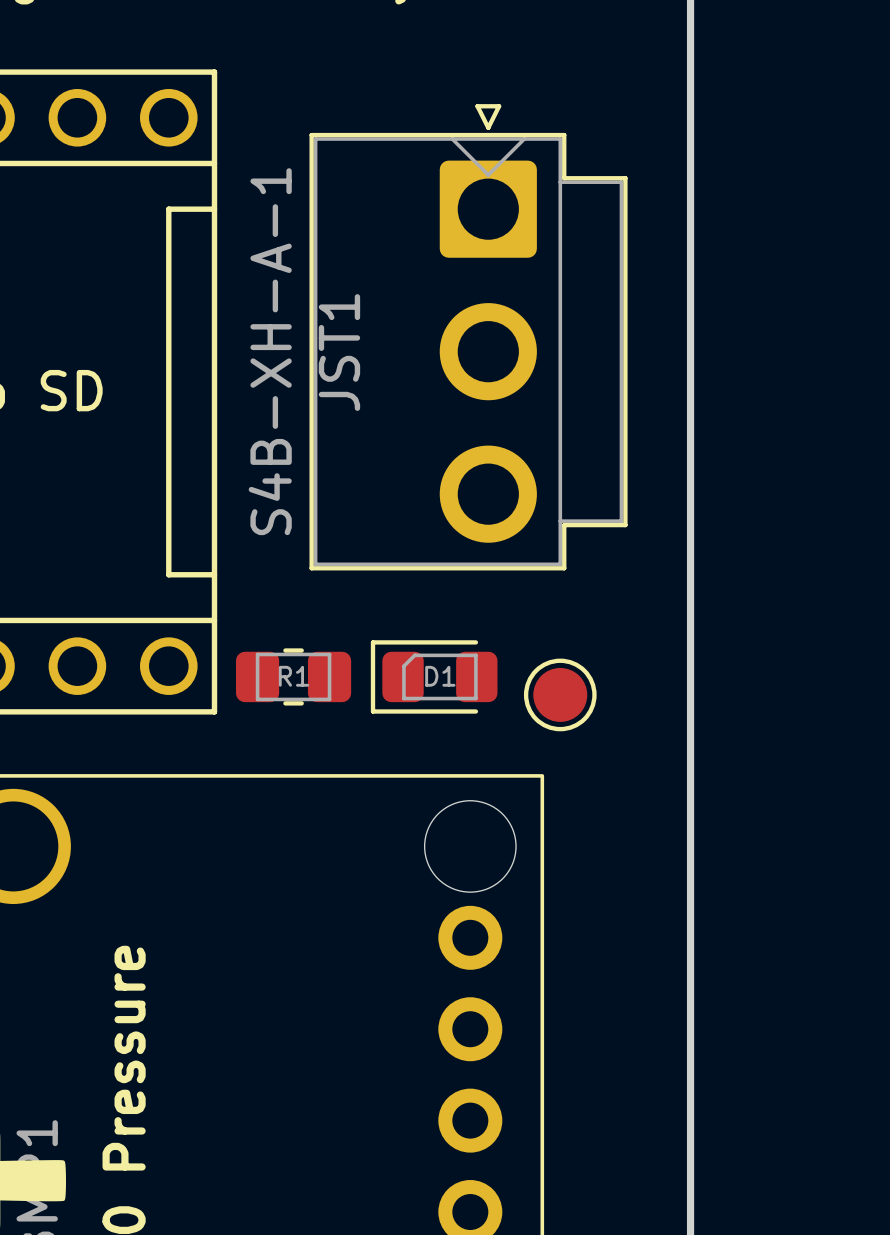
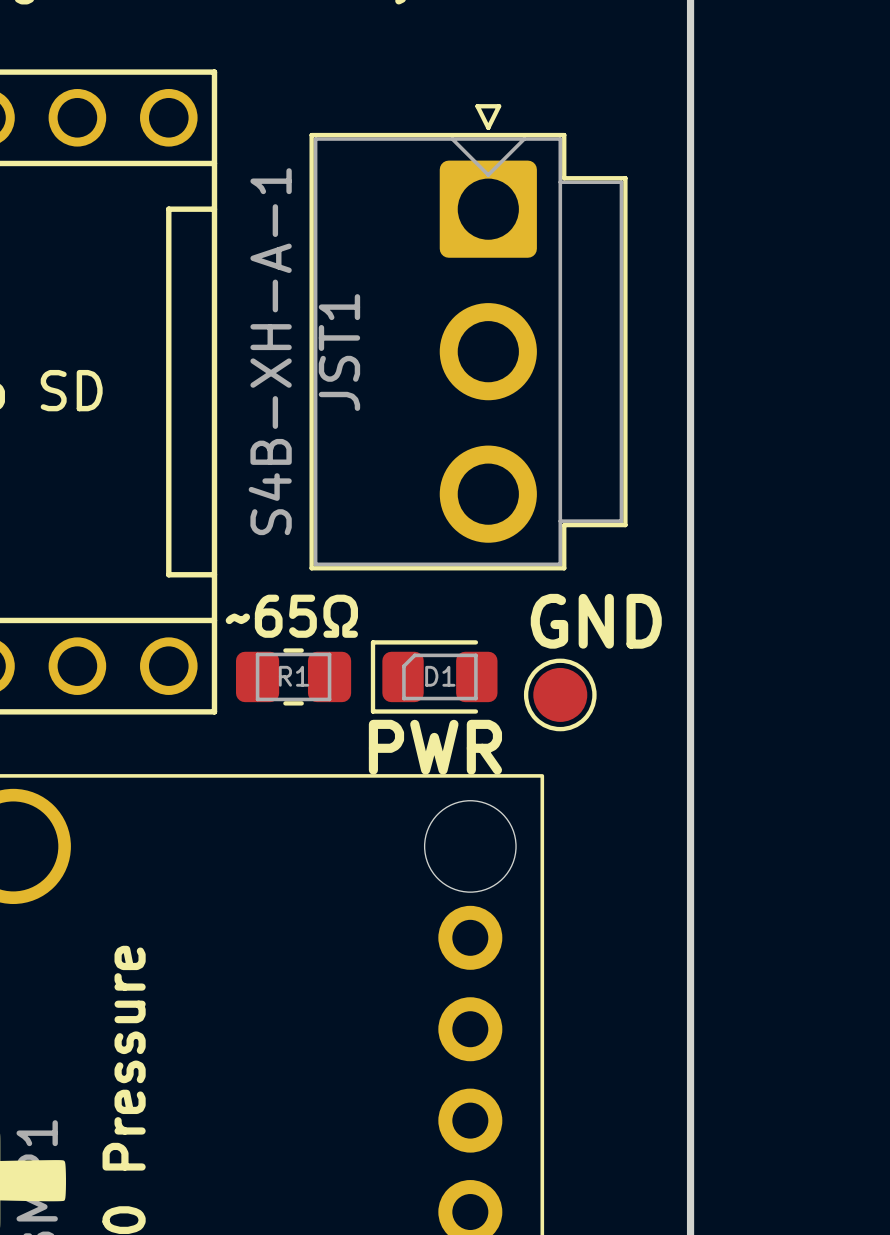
R1 value: none -> ~65Ω (291, 616)
part text: none -> GND (596, 621)
D1 text: none -> PWR (435, 747)

